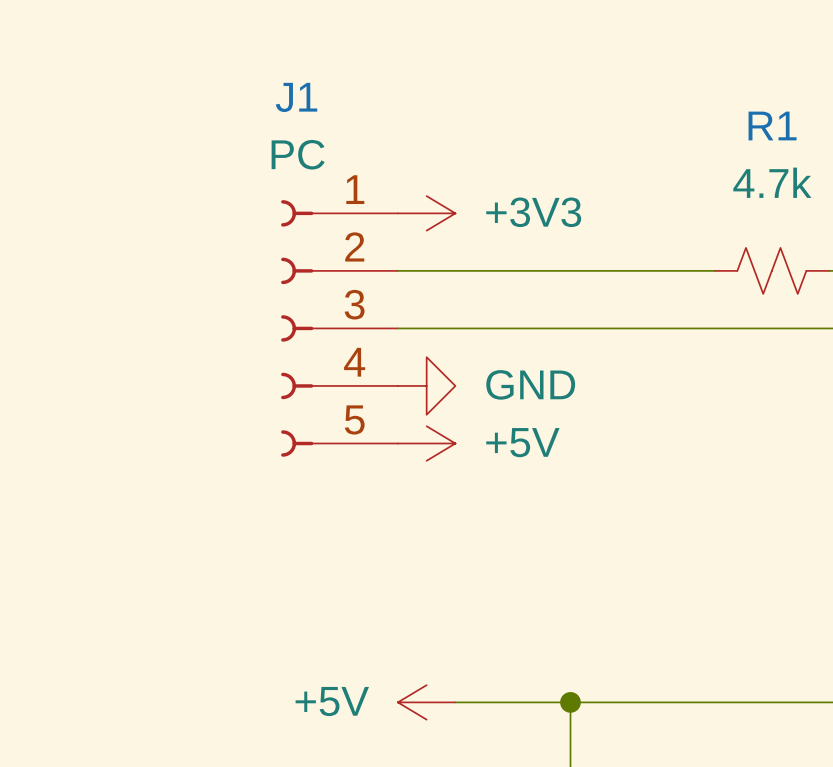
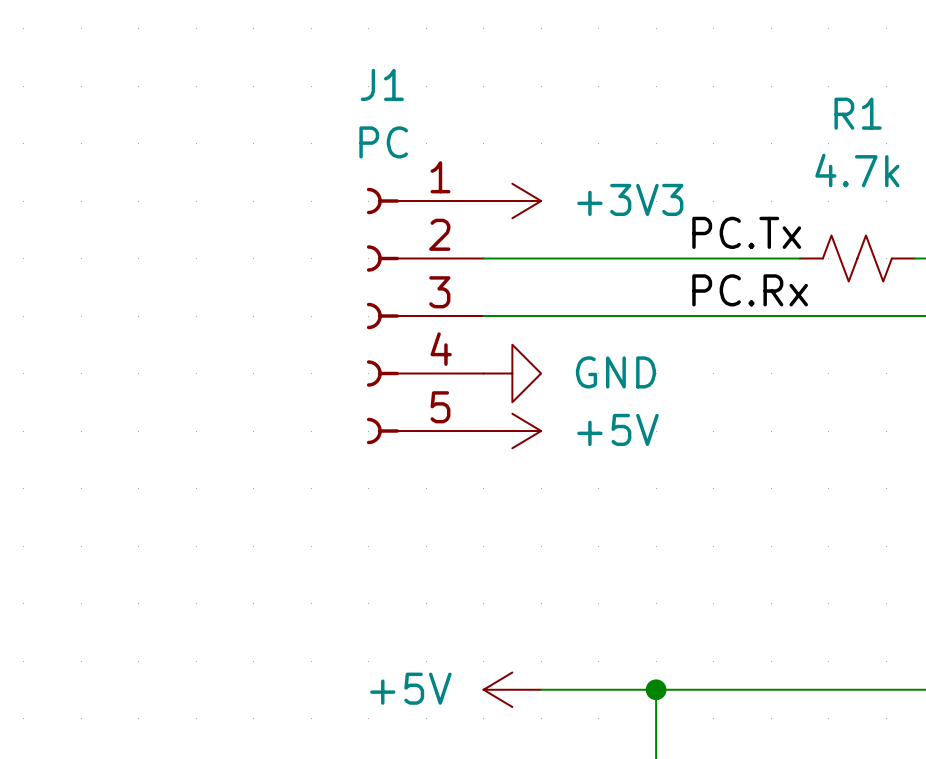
label: none -> PC.Tx (746, 232)
label: none -> PC.Rx (750, 290)

